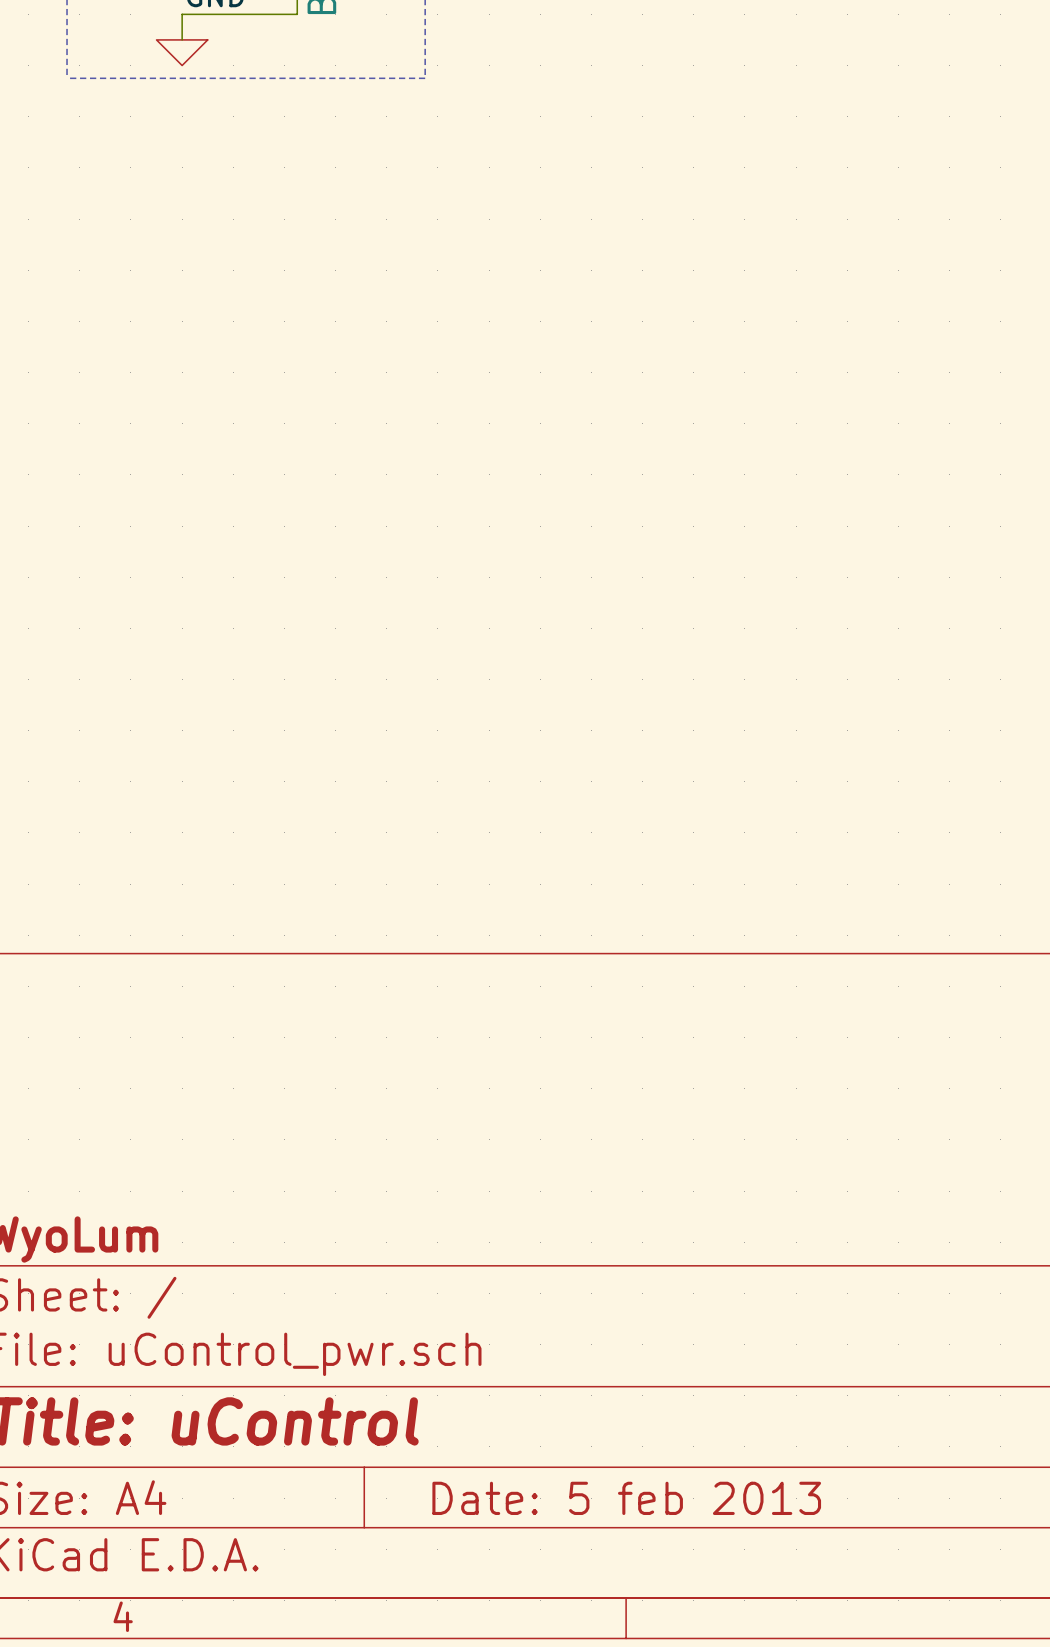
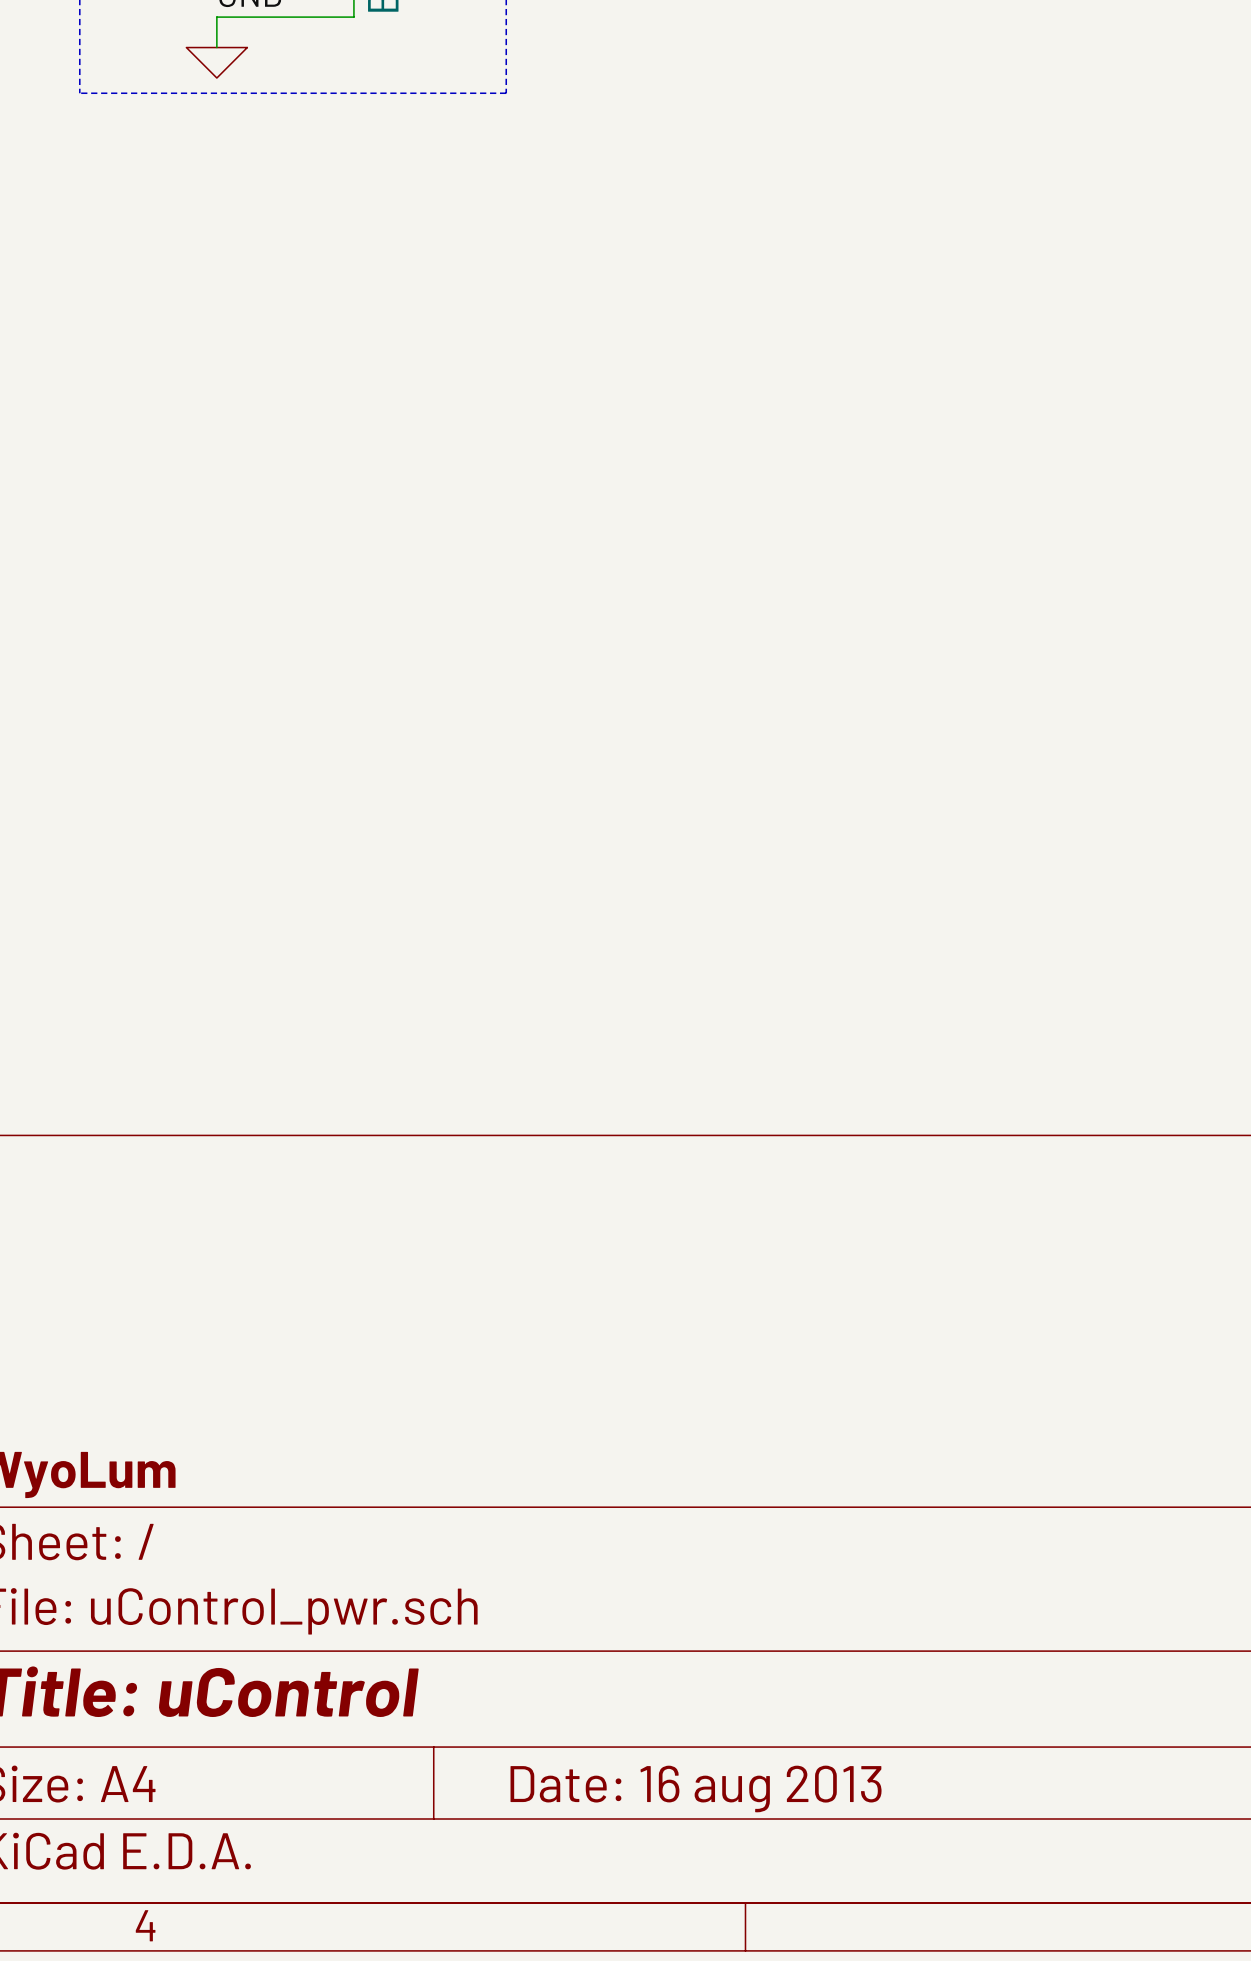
title block: Date: 5 feb 2013 (626, 1498) -> Date: 16 aug 2013 (696, 1788)

